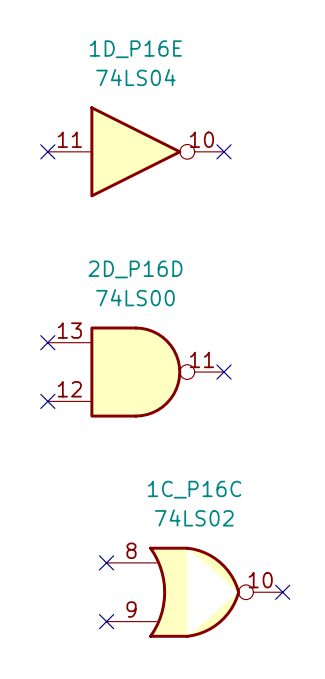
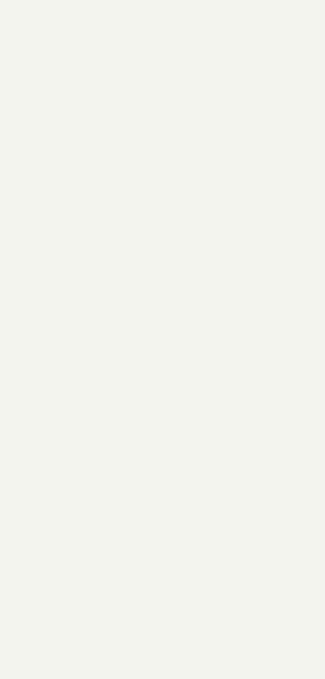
no-connect mark: (47, 151) -> none
1D_P16E: 74LS04 (135, 151) -> none
no-connect mark: (223, 151) -> none
no-connect mark: (47, 342) -> none
2D_P16D: 74LS00 (135, 372) -> none
no-connect mark: (223, 372) -> none
no-connect mark: (47, 401) -> none
no-connect mark: (106, 562) -> none
1C_P16C: 74LS02 (194, 592) -> none
no-connect mark: (282, 592) -> none
no-connect mark: (106, 621) -> none

